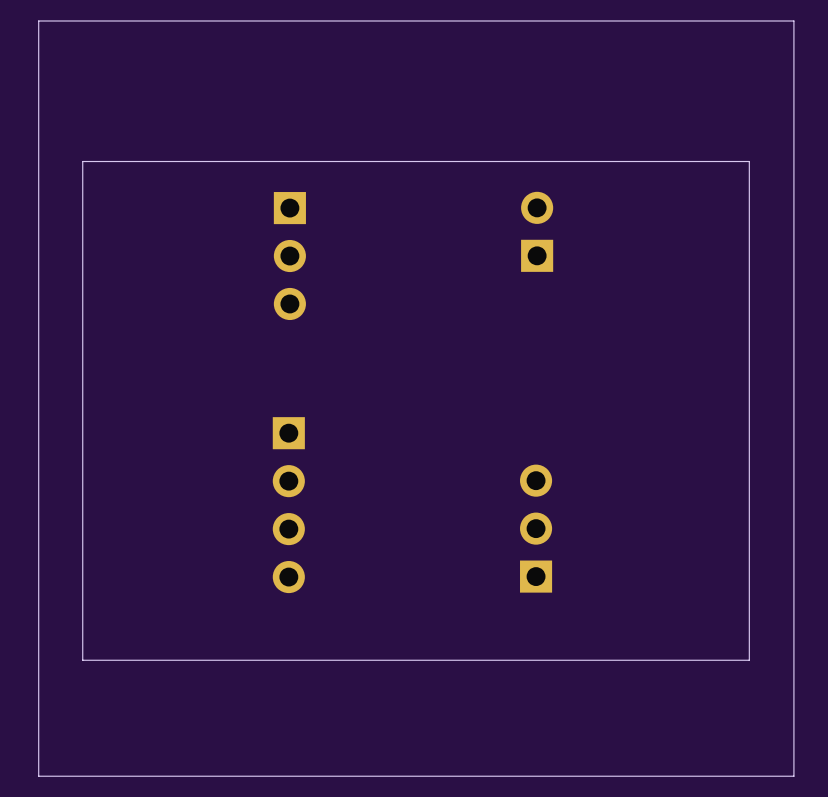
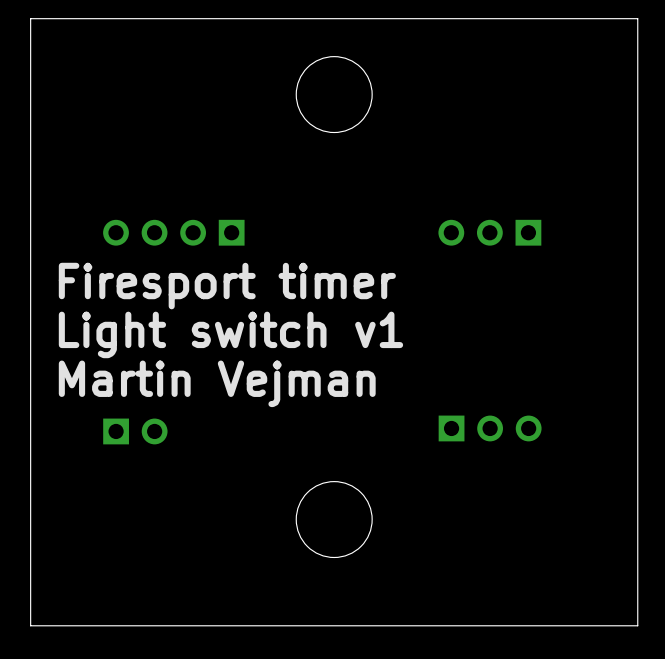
round board edge: none -> [295, 56, 373, 133]
board edge: (749, 161) (82, 161) (82, 660) (749, 660) (749, 161) -> none
part: (537, 231) -> none
part: (289, 256) -> none
part: none -> (489, 232)
text: none -> Firesport timer (227, 286)
text: none -> Light switch v1 (230, 334)
text: none -> Martin Vejman (217, 383)
part rotation: 0° (288, 505) -> 90° clockwise (173, 232)
part position: (288, 505) -> (173, 232)
part rotation: 0° (536, 528) -> 90° clockwise (490, 428)
part: none -> (135, 431)
round board edge: none -> [295, 481, 373, 558]

